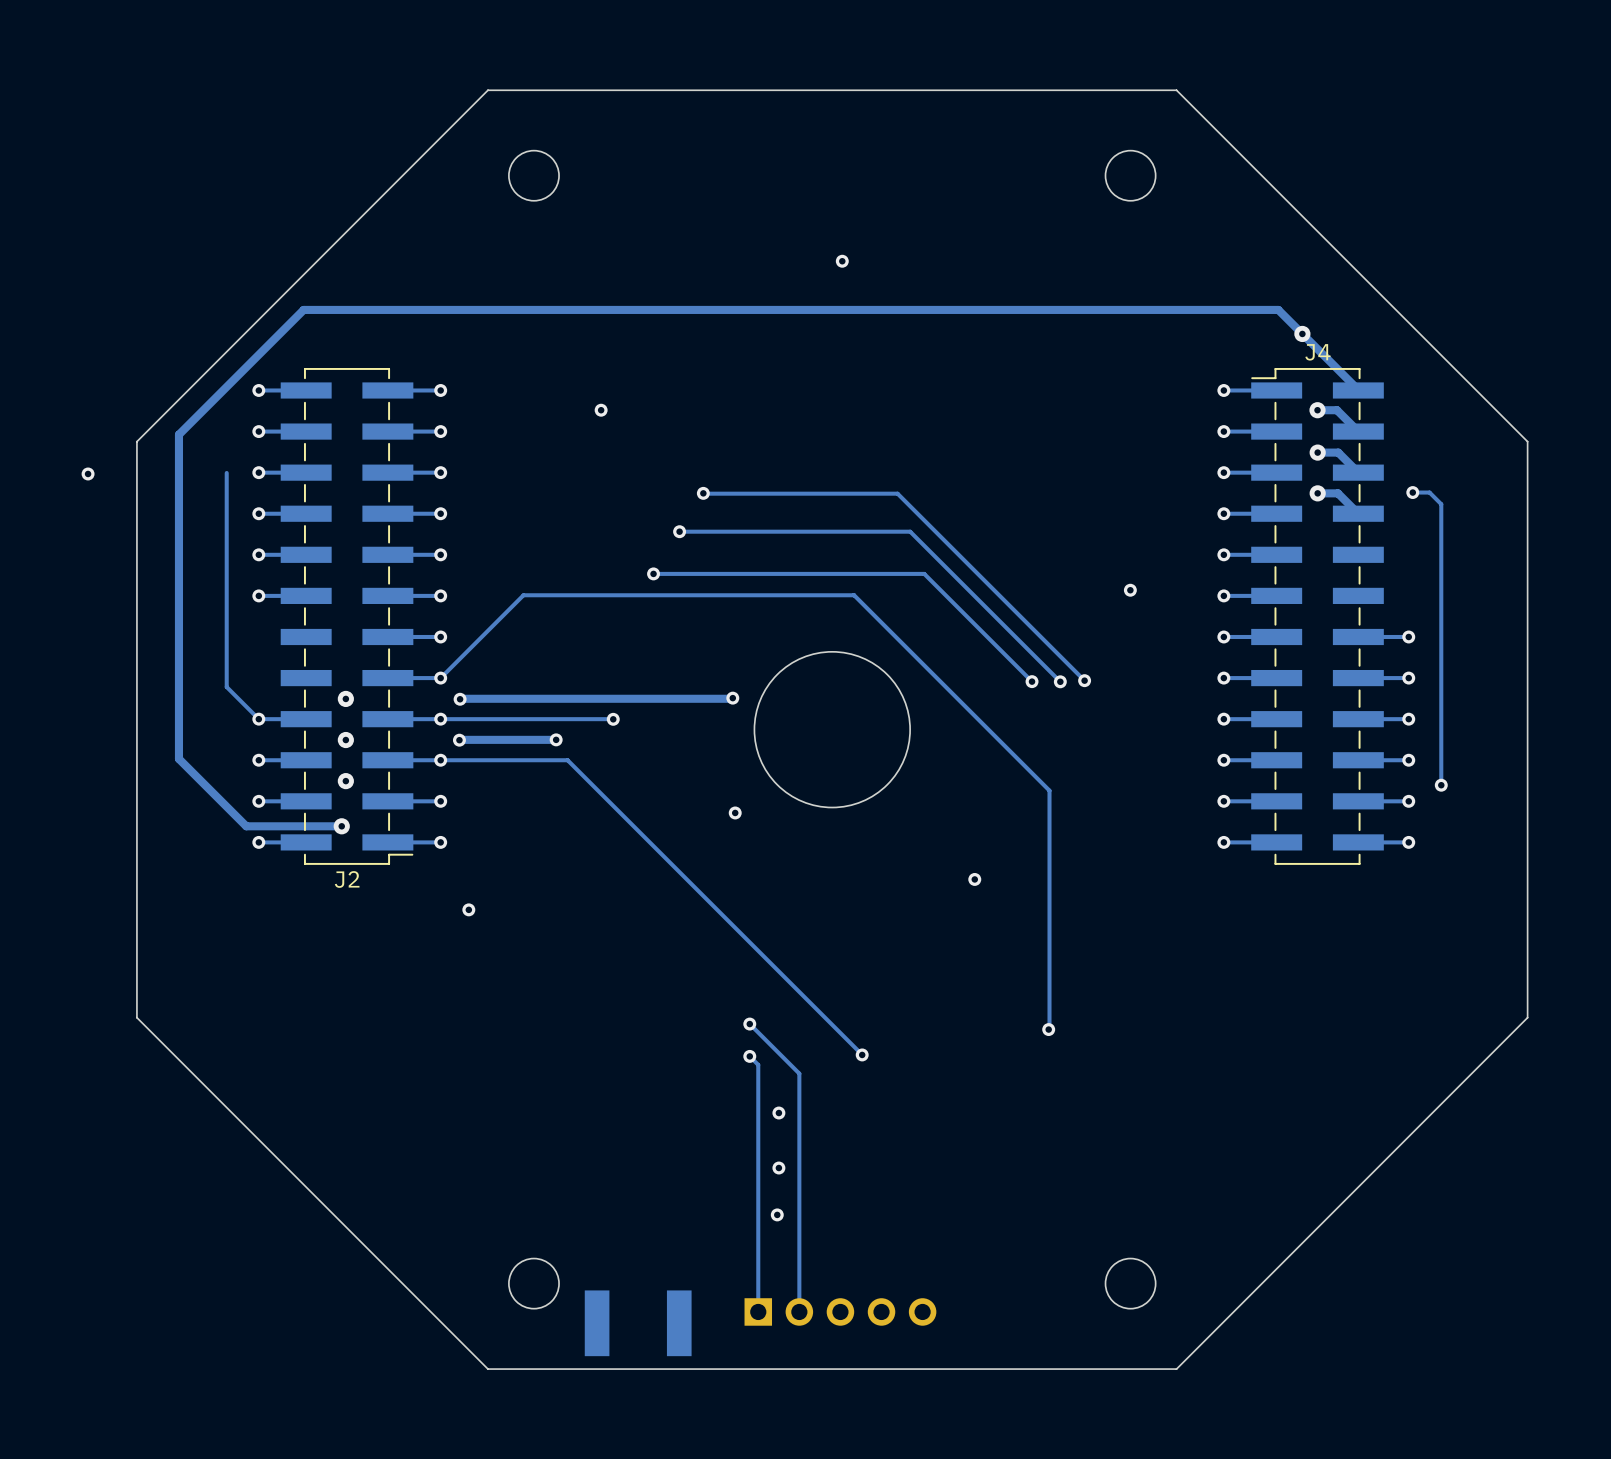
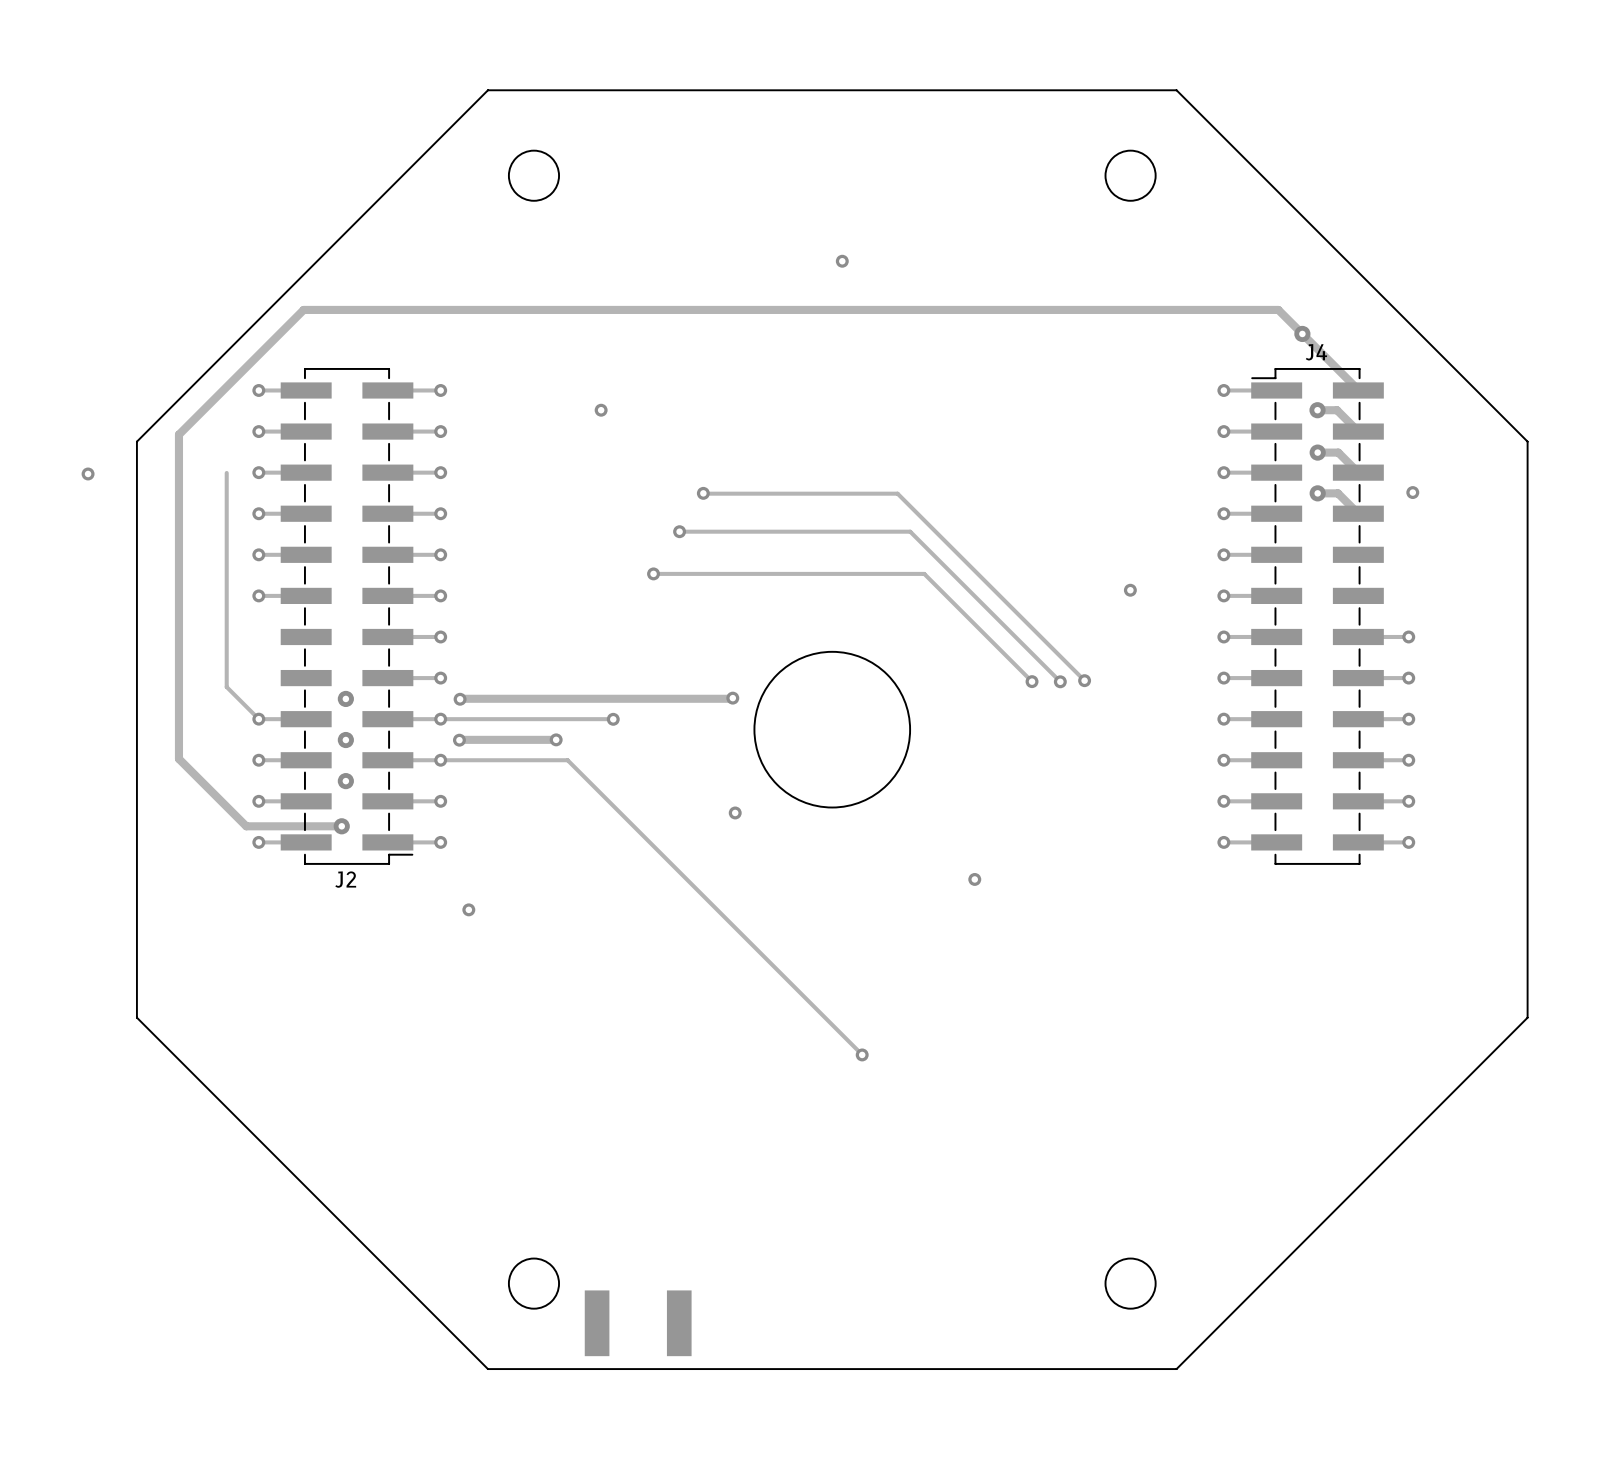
track: (1412, 492) (1429, 492) (1441, 504) (1441, 785) -> none
track: (854, 595) (1049, 790) (1048, 1029) -> none
track: (854, 595) (523, 595) (440, 678) -> none
via: (1441, 785) -> none
track: (749, 1024) (799, 1073) (799, 1311) -> none
via: (749, 1024) -> none
via: (1048, 1029) -> none
track: (749, 1056) (758, 1064) (758, 1311) -> none
via: (749, 1056) -> none
via: (778, 1113) -> none
via: (778, 1168) -> none
via: (777, 1214) -> none
part: (840, 1311) -> none

